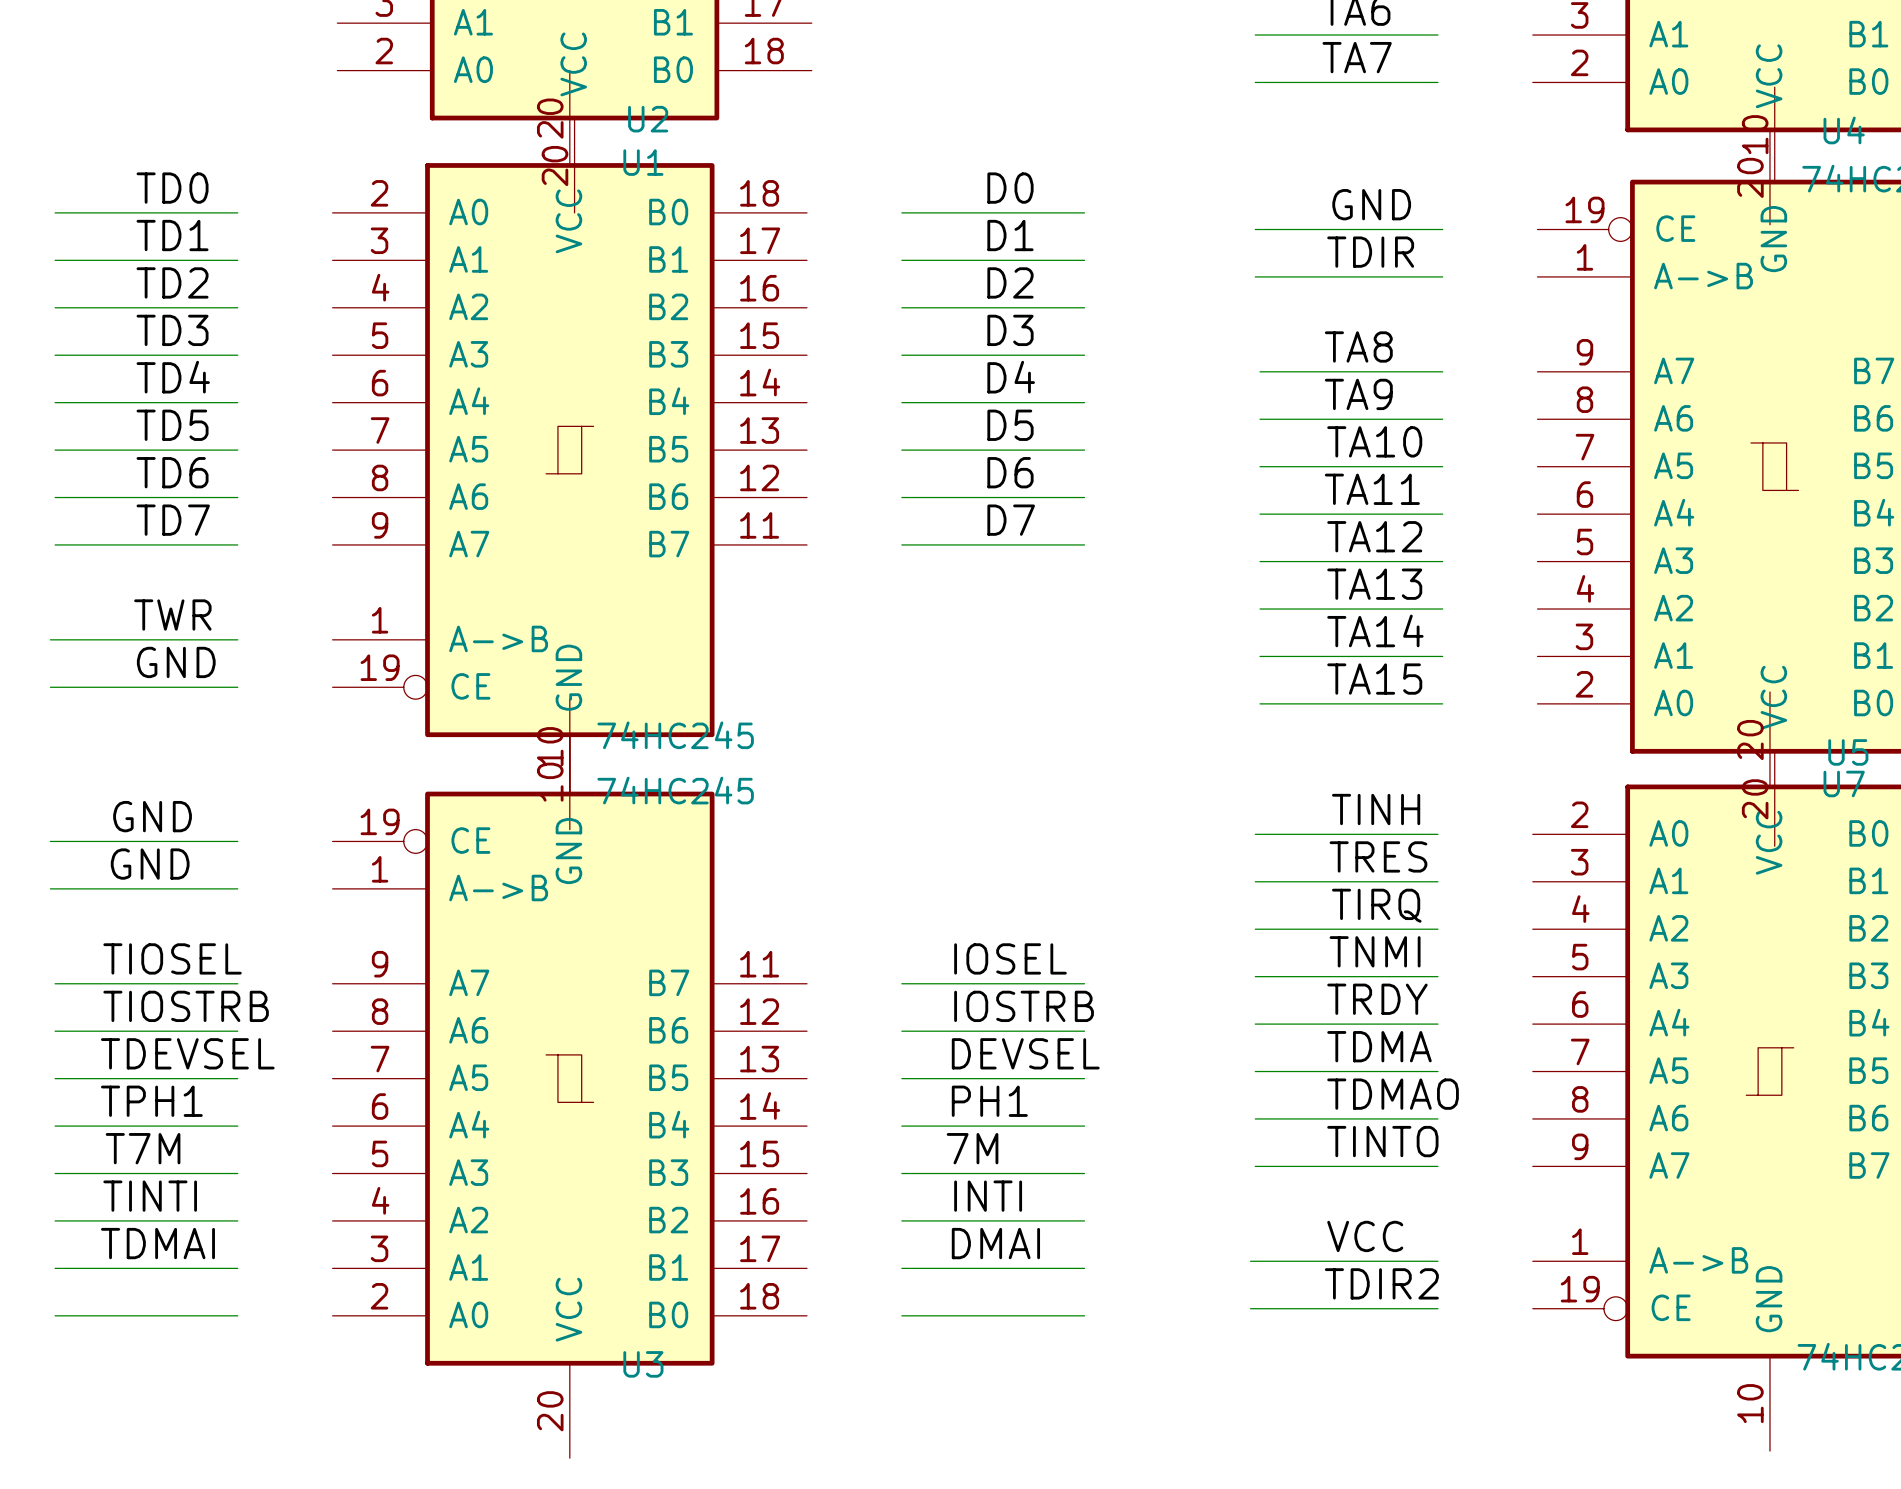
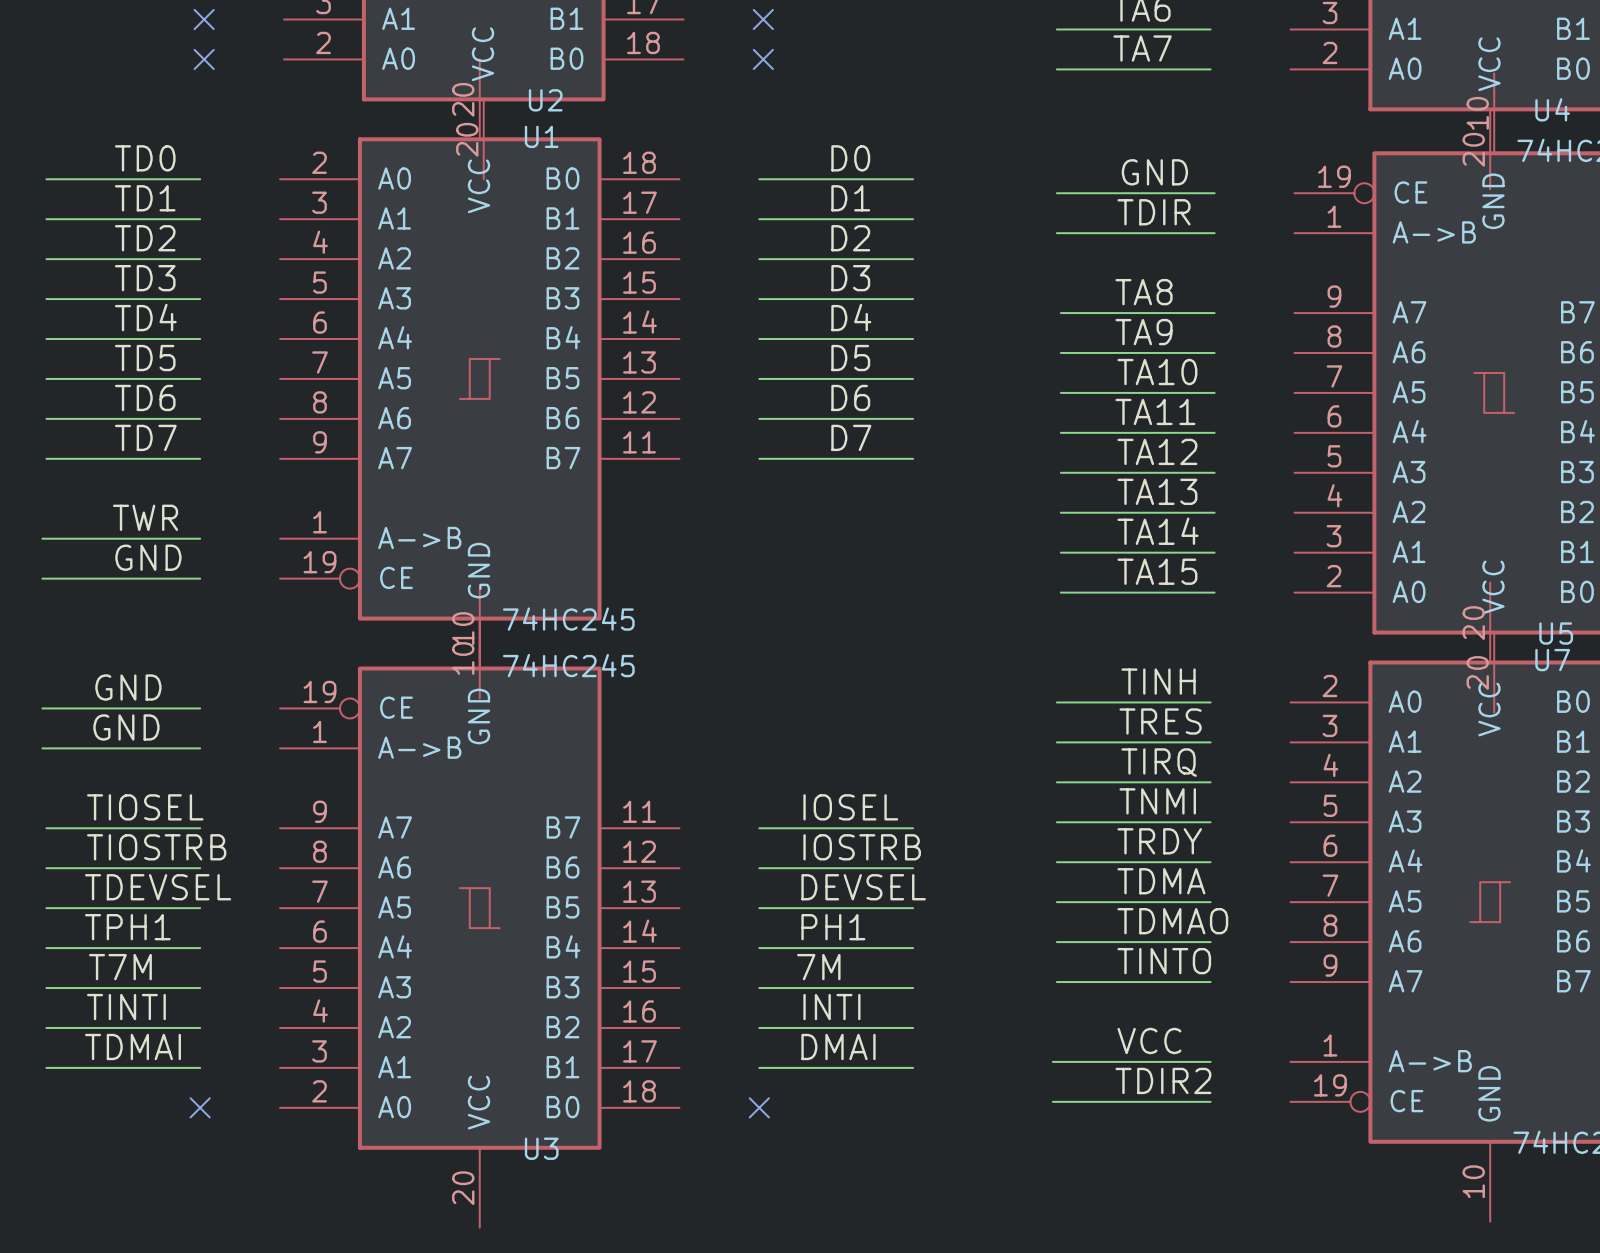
no-connect mark: none -> (204, 19)
no-connect mark: none -> (763, 19)
no-connect mark: none -> (204, 59)
no-connect mark: none -> (763, 59)
wire: (55, 1315) (237, 1315) -> none
no-connect mark: none -> (200, 1107)
wire: (901, 1315) (1084, 1315) -> none
no-connect mark: none -> (759, 1107)

